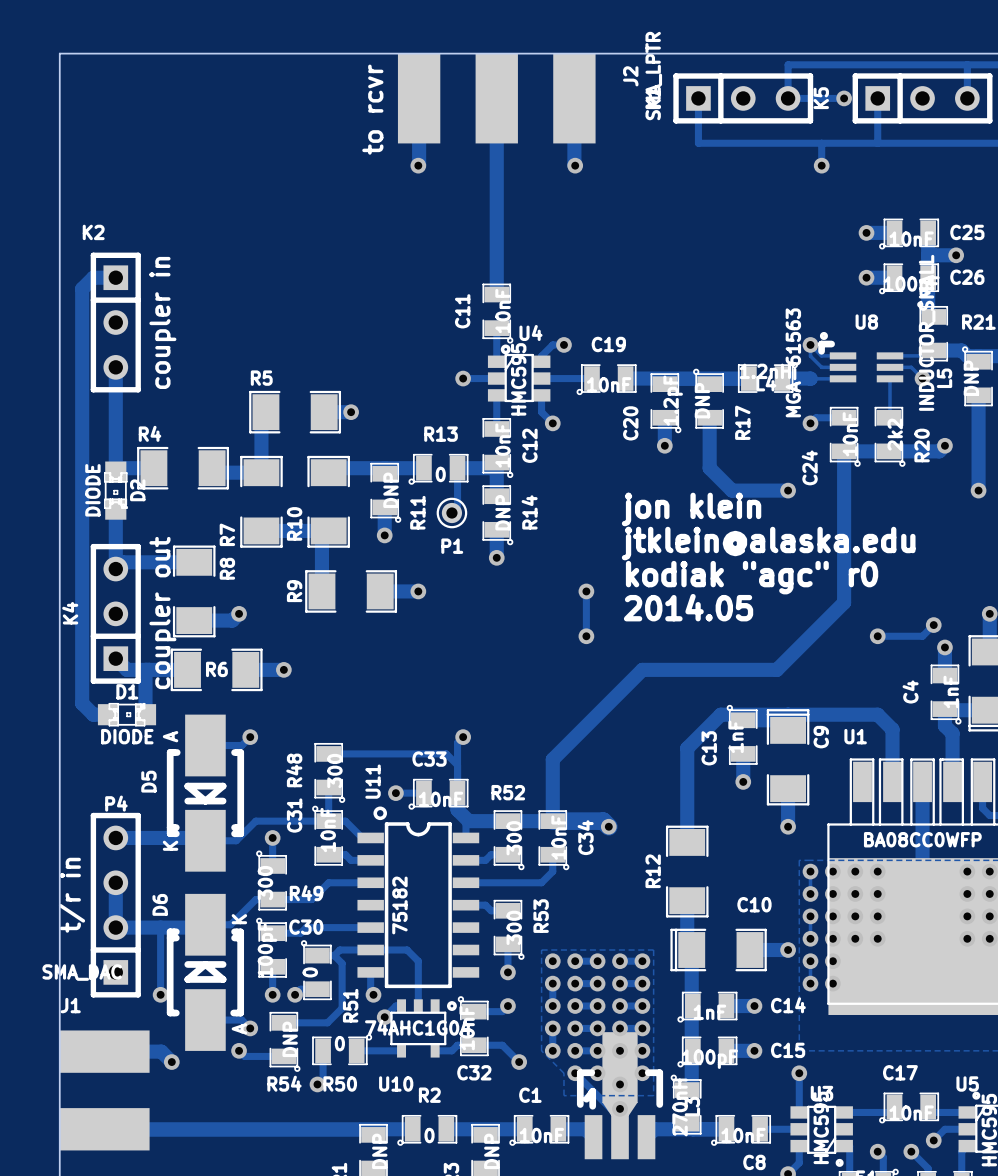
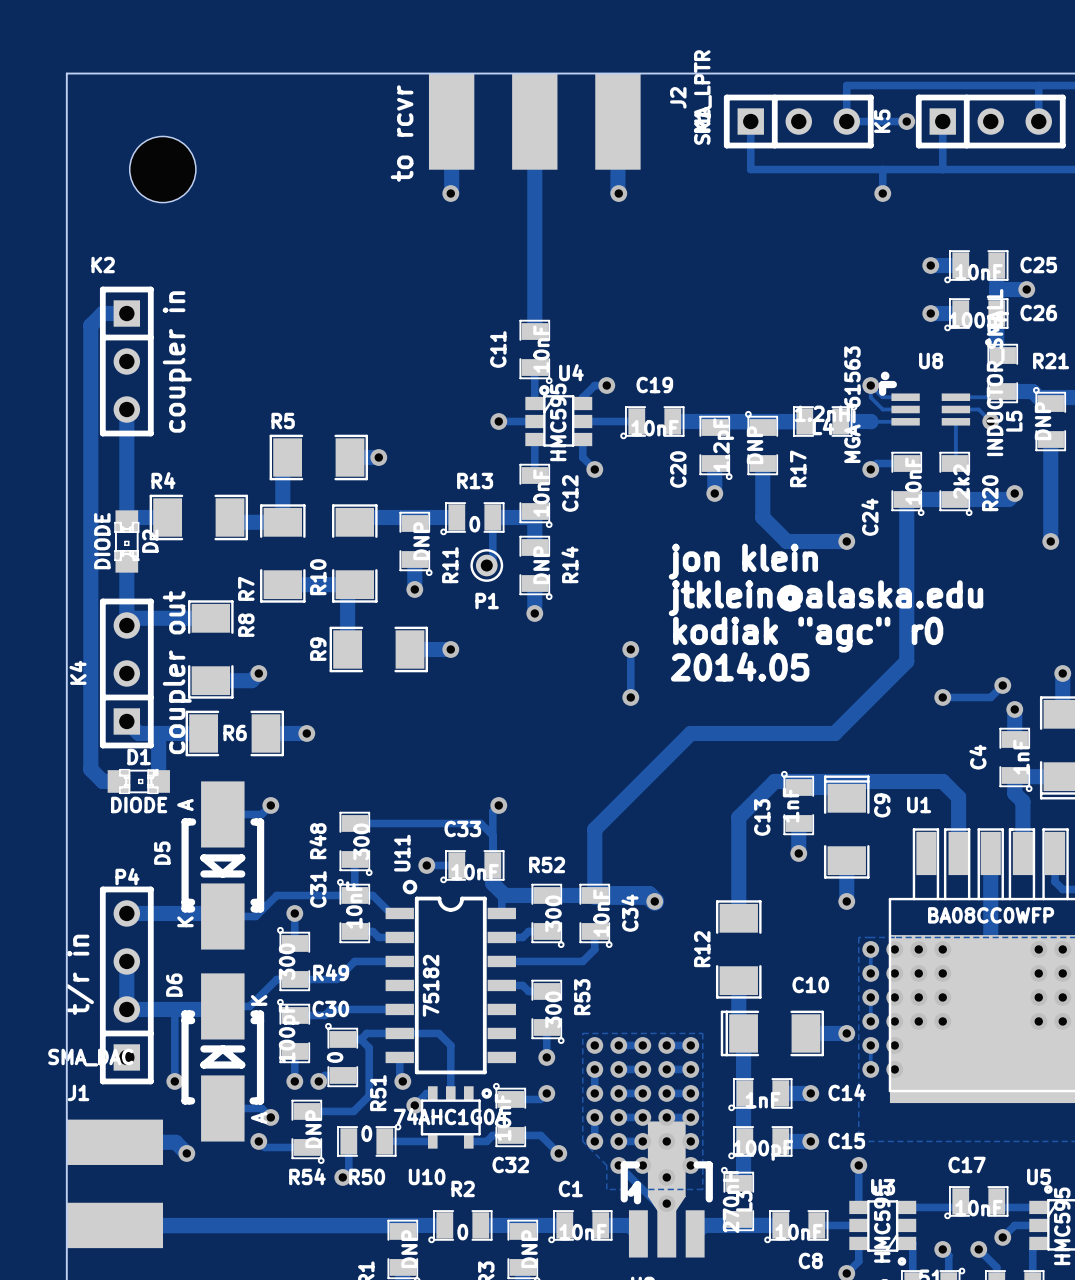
part: none -> (162, 169)

